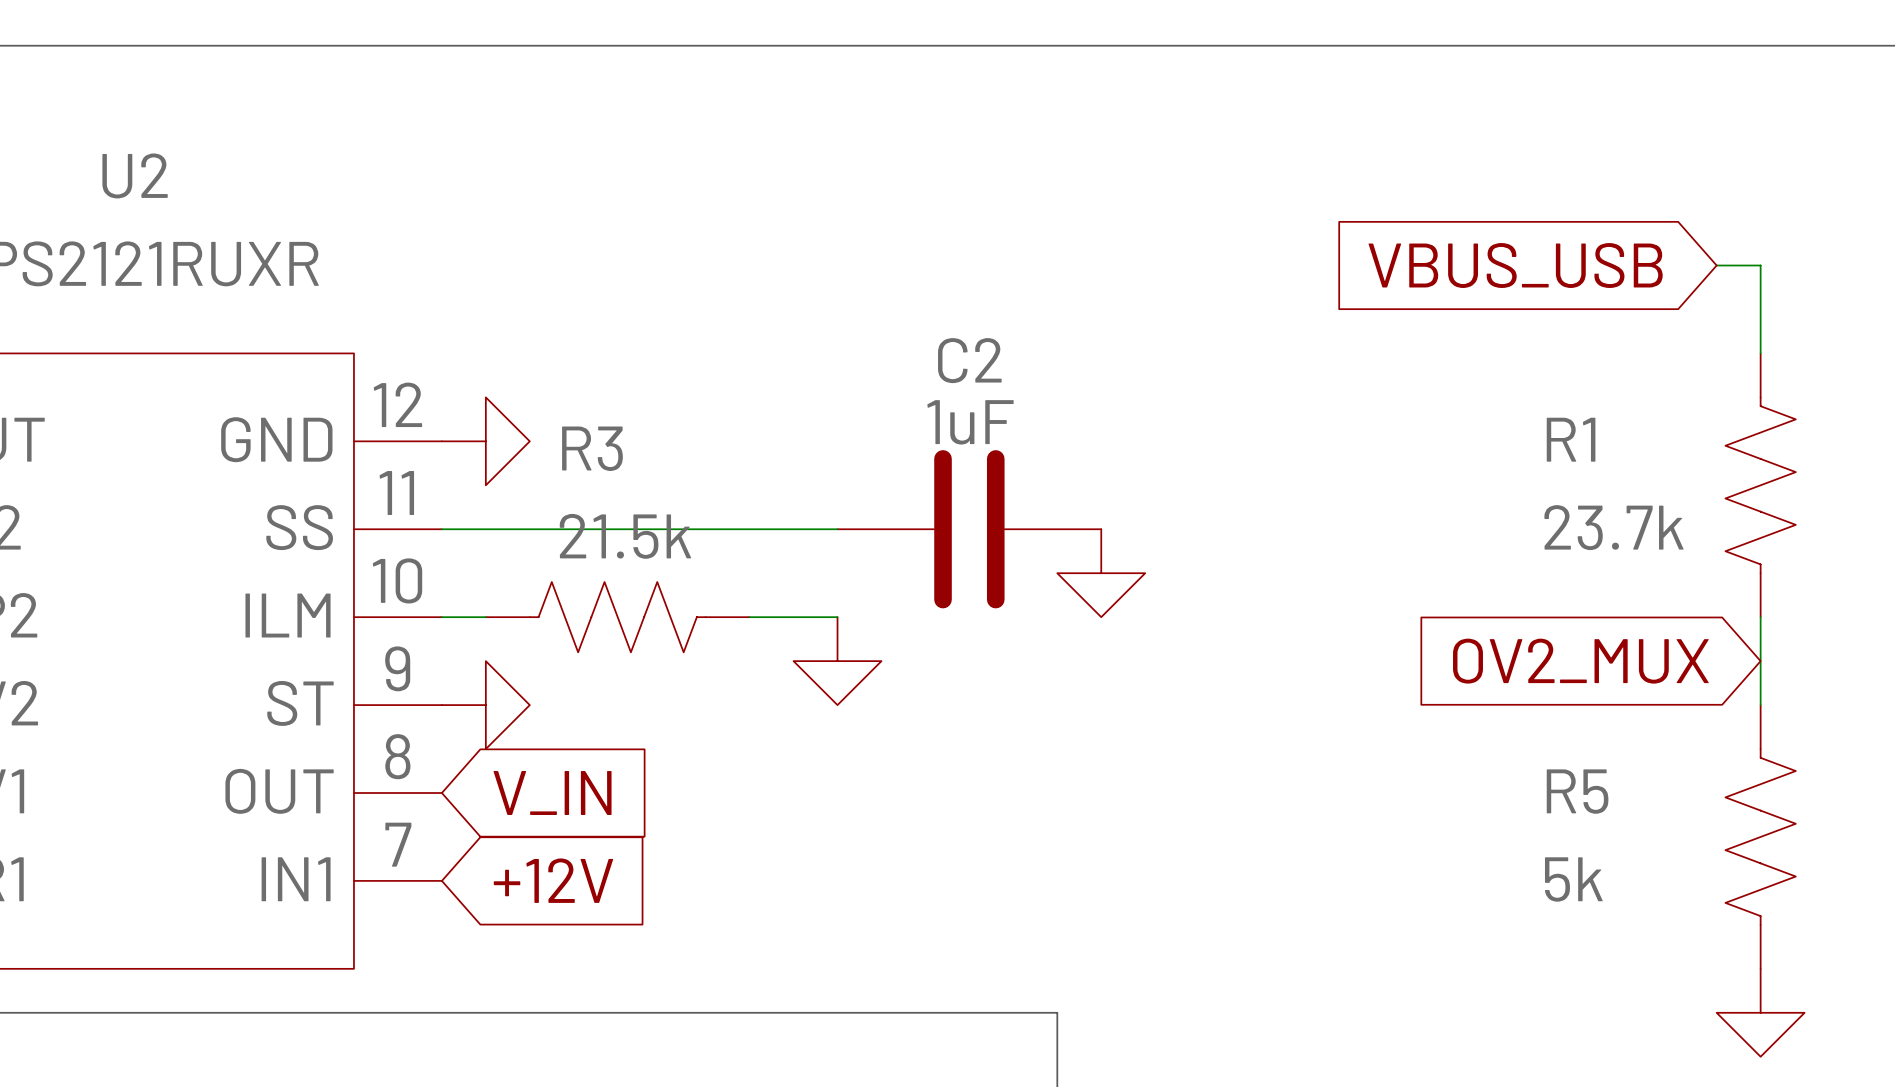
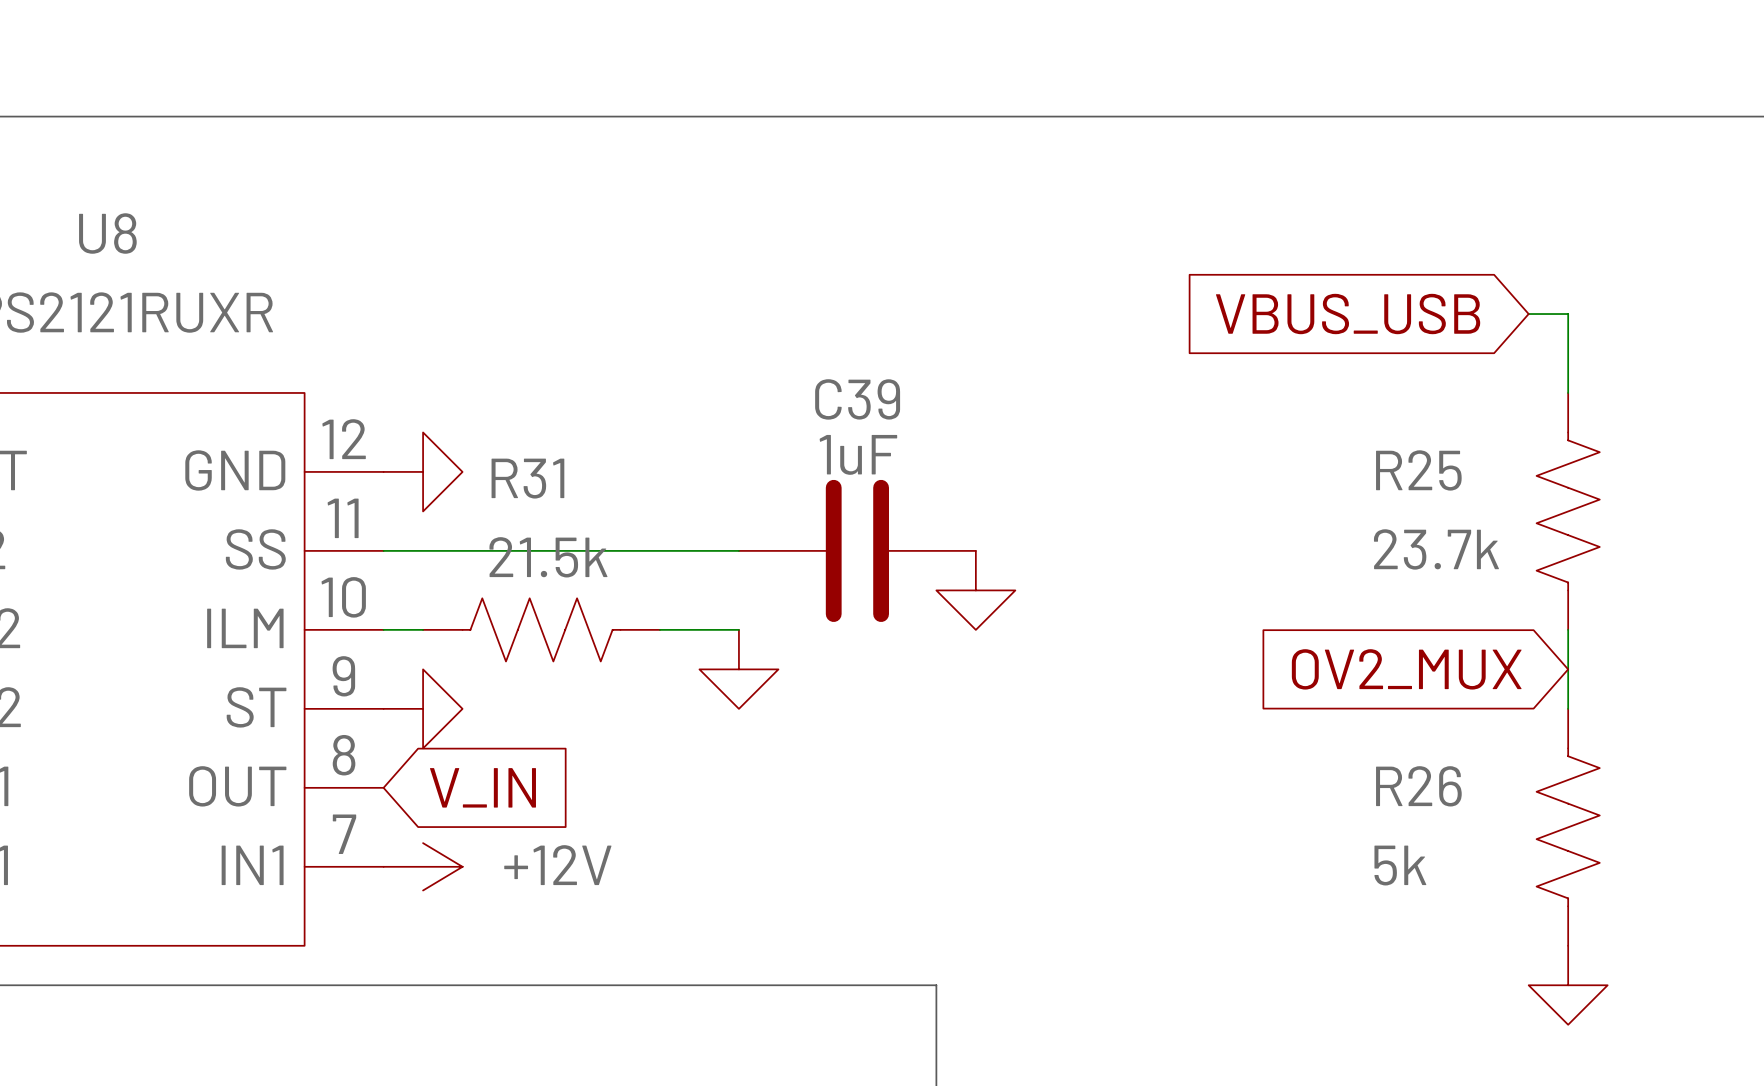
U2 name: U2 (135, 175) -> U8 (107, 233)
C2 name: C2 (969, 360) -> C39 (857, 399)
R1 name: R1 (1571, 439) -> R25 (1418, 470)
R3 name: R3 (592, 448) -> R31 (527, 478)
R5 name: R5 (1577, 791) -> R26 (1418, 786)
power symbol: none -> +12V (423, 866)
global label: +12V (553, 880) -> none

